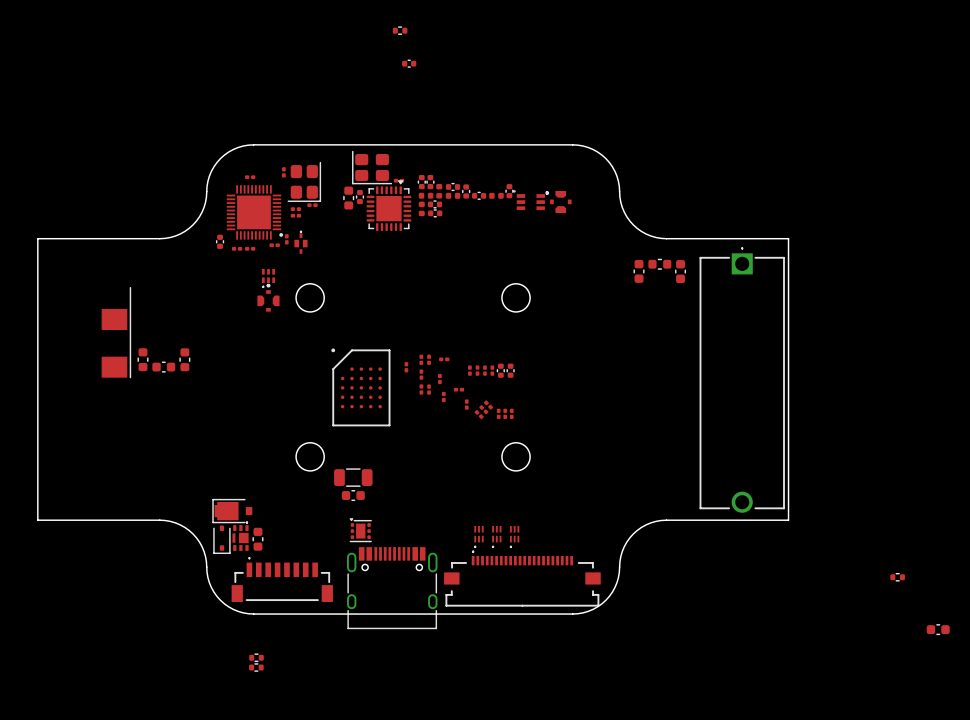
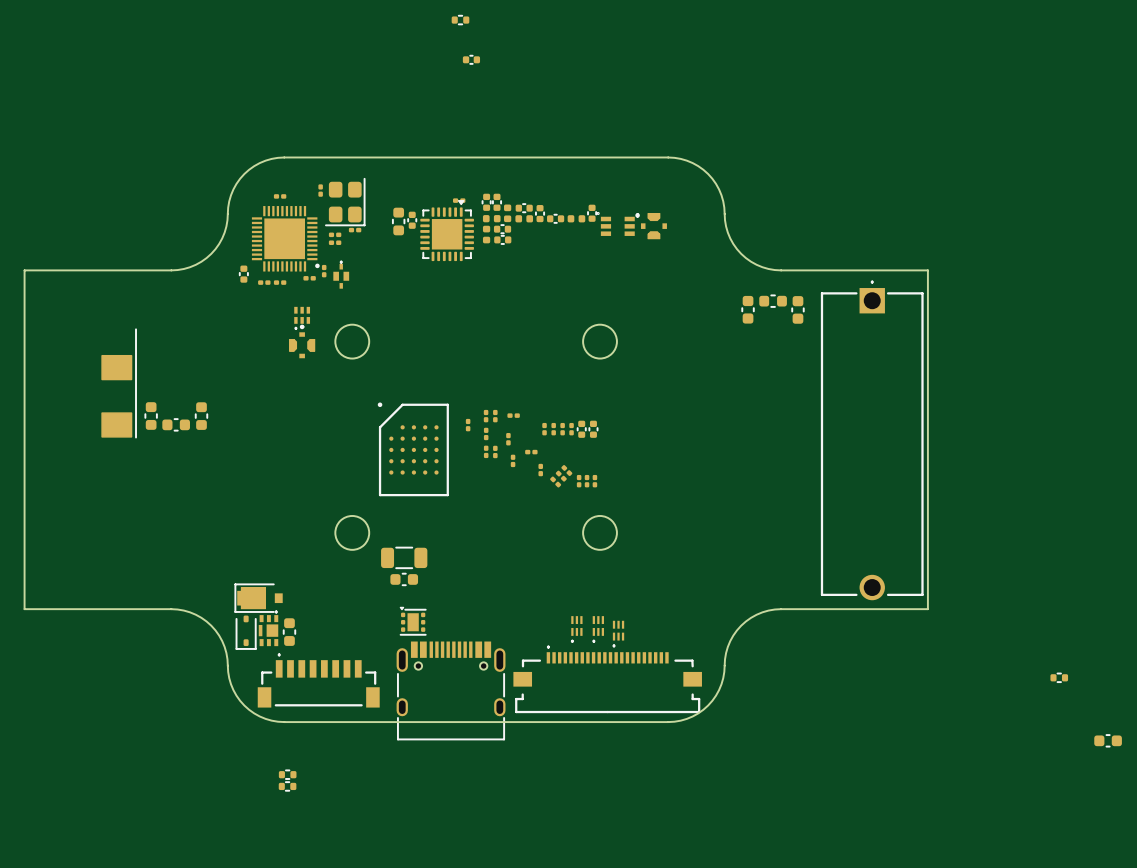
part: (372, 167) -> none
part position: (478, 536) -> (618, 633)

